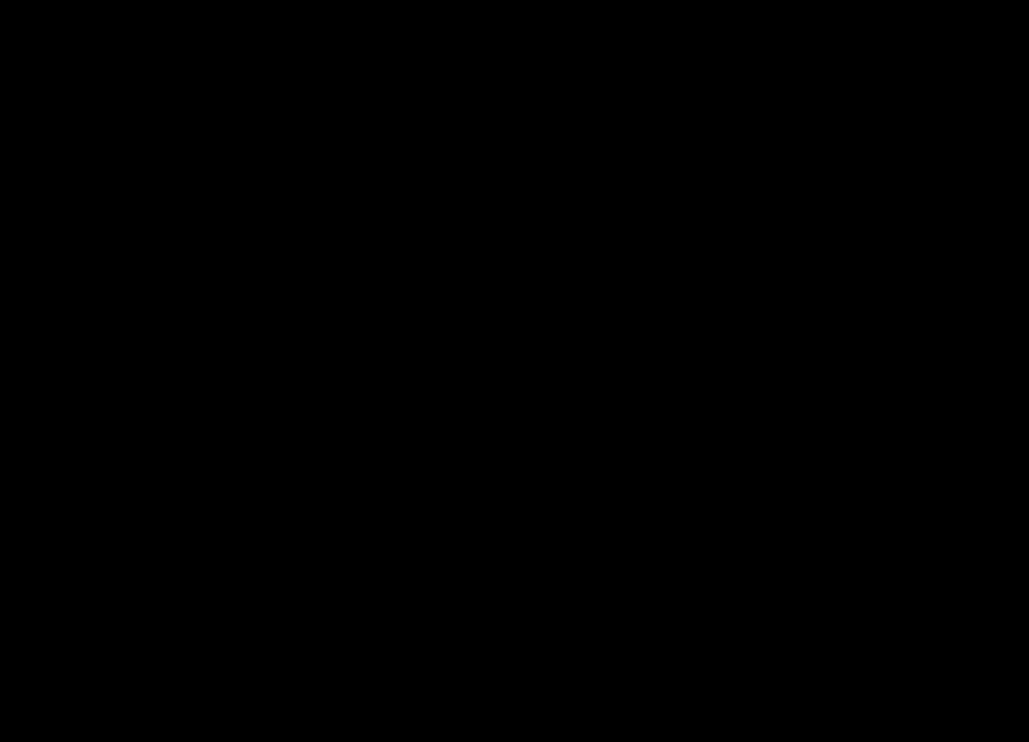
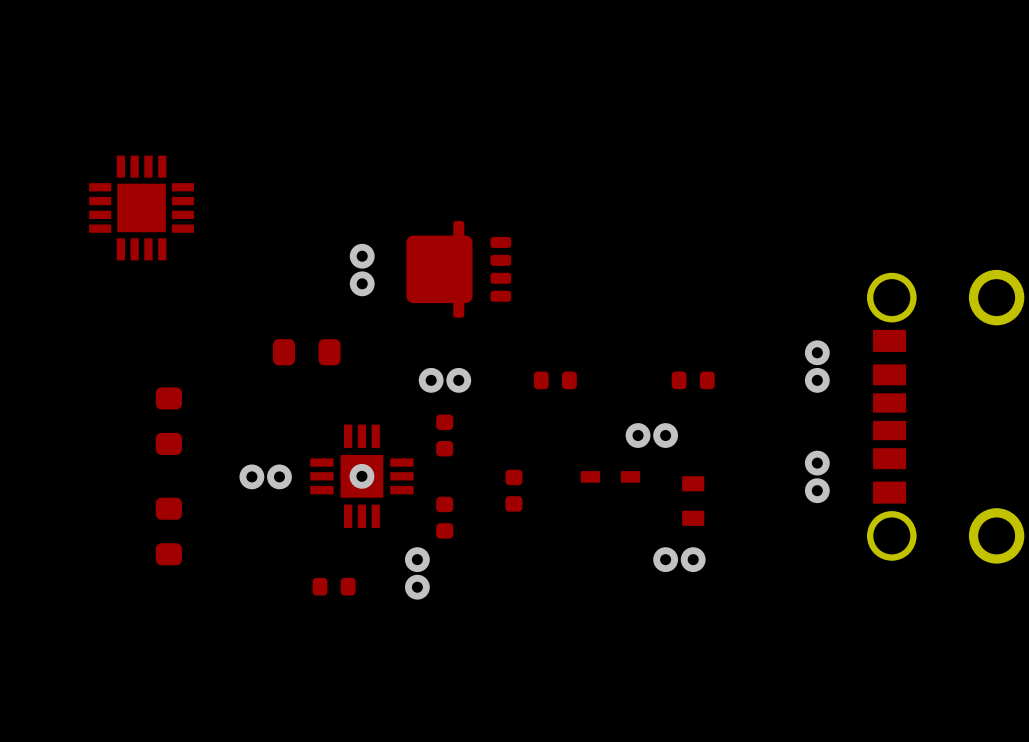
part: none -> (141, 207)
via: none -> (362, 256)
part: none -> (458, 269)
via: none -> (362, 283)
part: none -> (306, 352)
via: none -> (817, 352)
via: none -> (431, 380)
via: none -> (458, 380)
part: none -> (555, 380)
part: none -> (693, 380)
via: none -> (817, 380)
part: none -> (945, 416)
part: none -> (168, 421)
part: none -> (444, 435)
via: none -> (638, 435)
via: none -> (665, 435)
via: none -> (817, 463)
via: none -> (251, 476)
via: none -> (279, 476)
part: none -> (361, 476)
via: none -> (361, 476)
part: none -> (610, 476)
part: none -> (513, 490)
via: none -> (817, 490)
part: none -> (693, 501)
part: none -> (444, 517)
part: none -> (168, 531)
via: none -> (417, 559)
via: none -> (665, 559)
via: none -> (693, 559)
part: none -> (334, 586)
via: none -> (417, 587)

